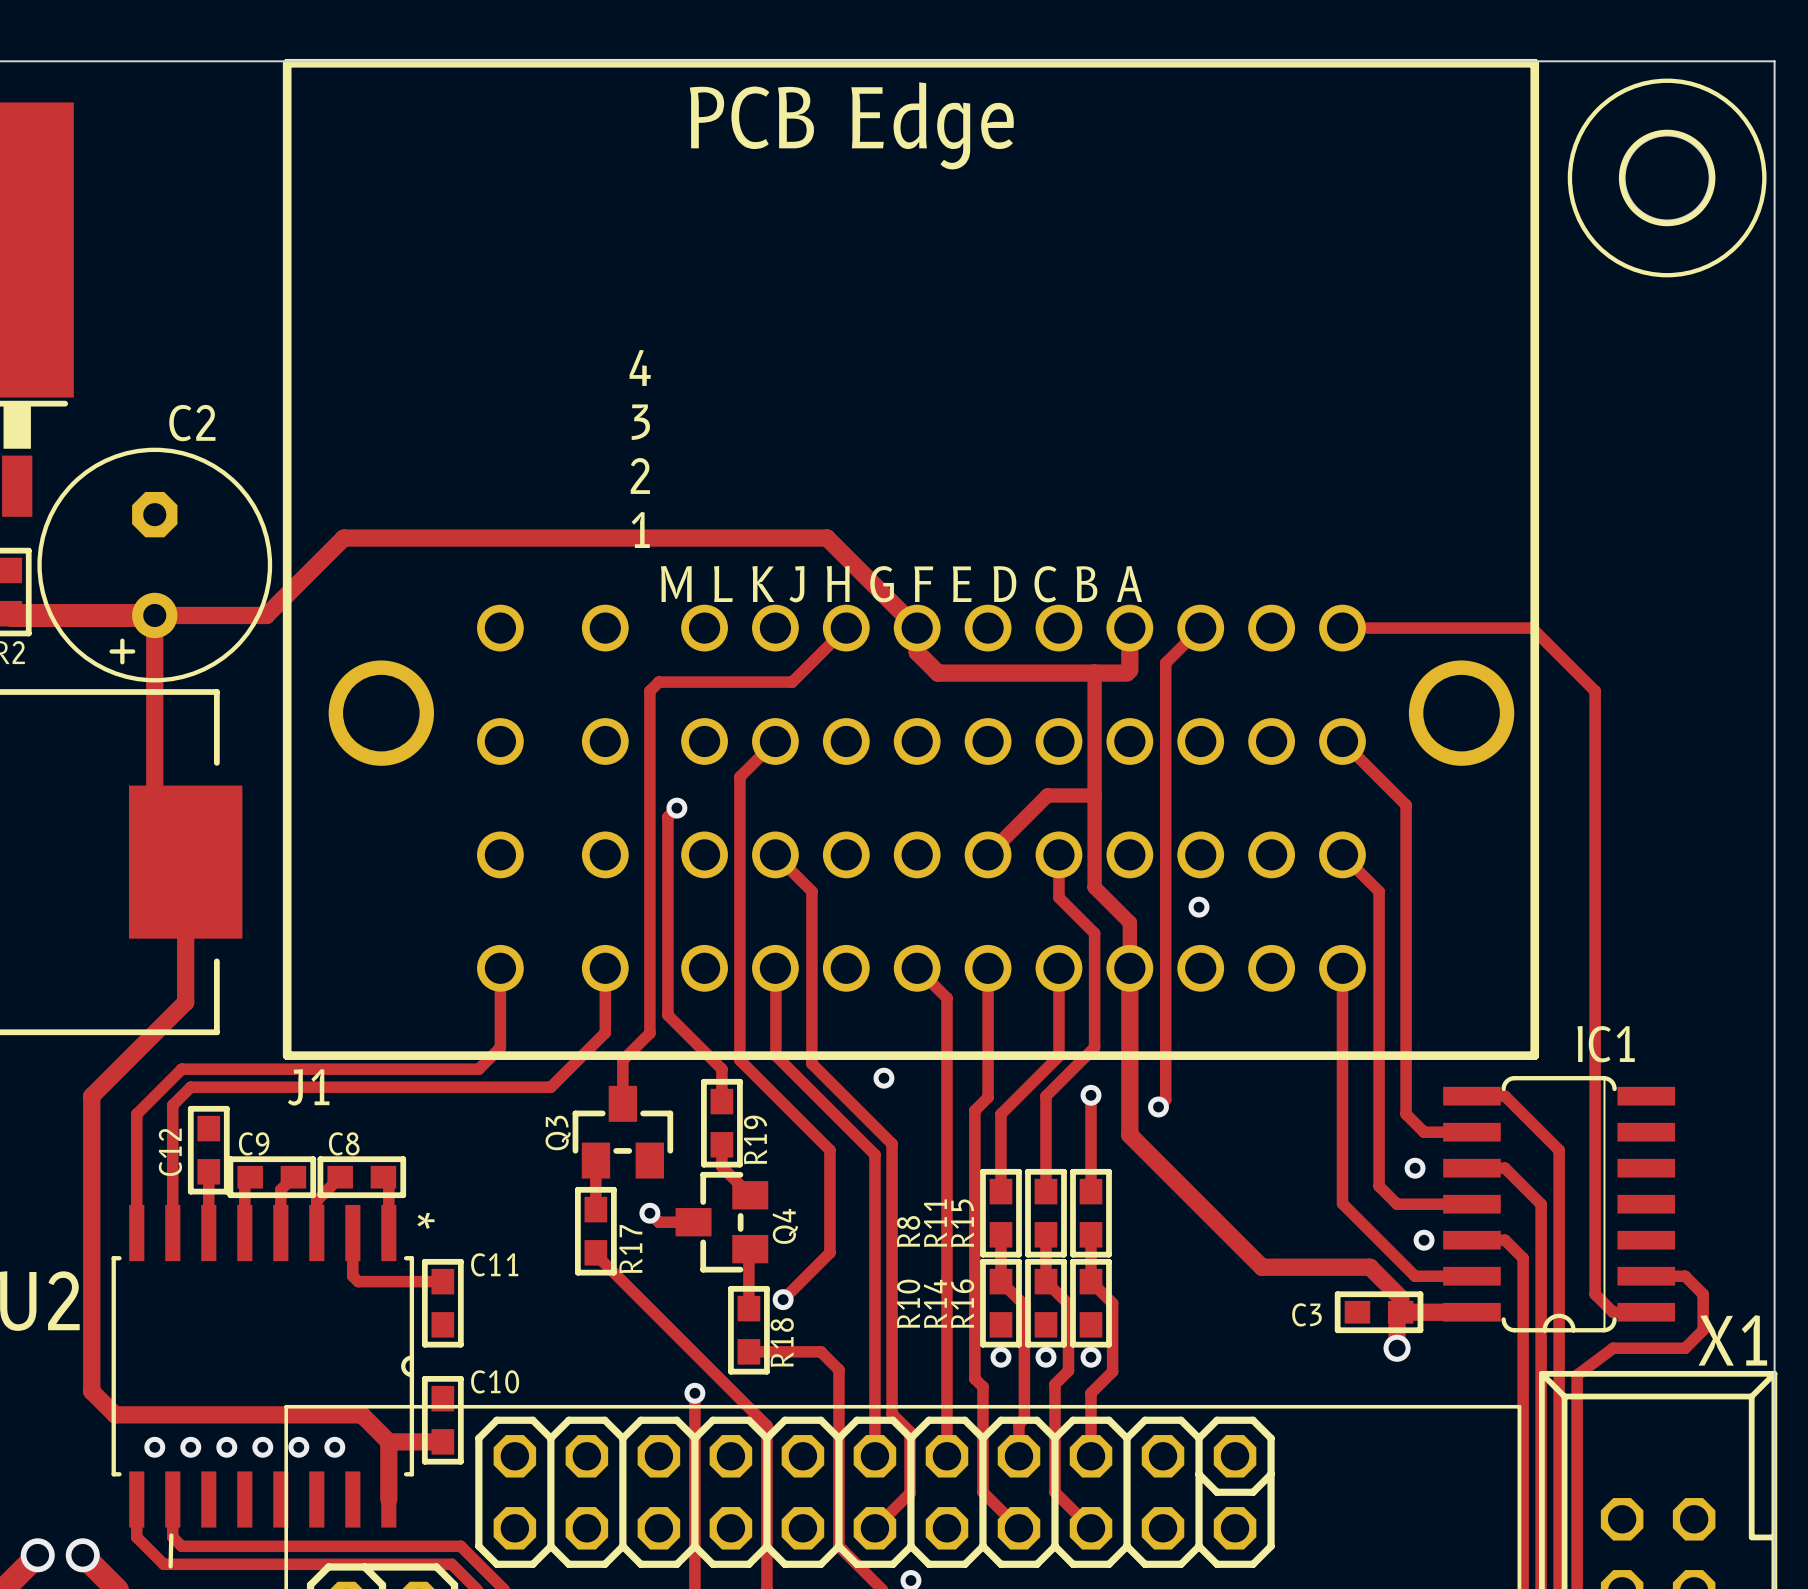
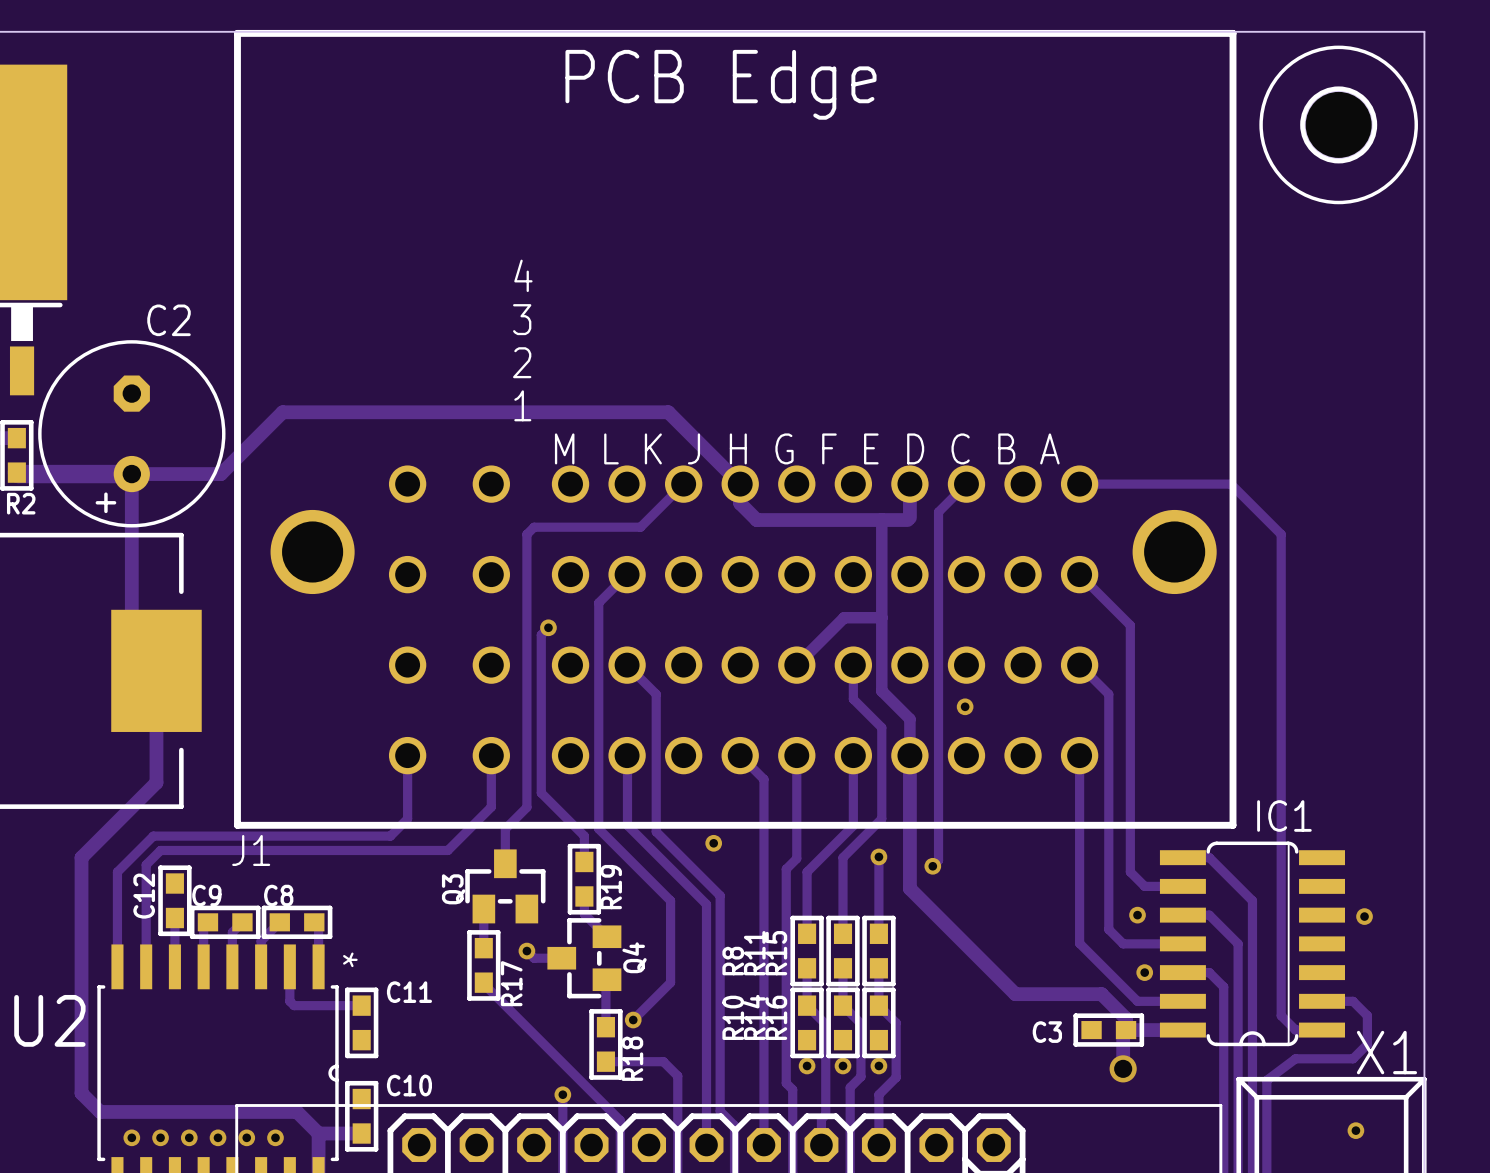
via: none -> (1364, 916)
via size: [1383, 1334, 1411, 1362] -> [1109, 1055, 1137, 1083]
via: none -> (1355, 1130)

